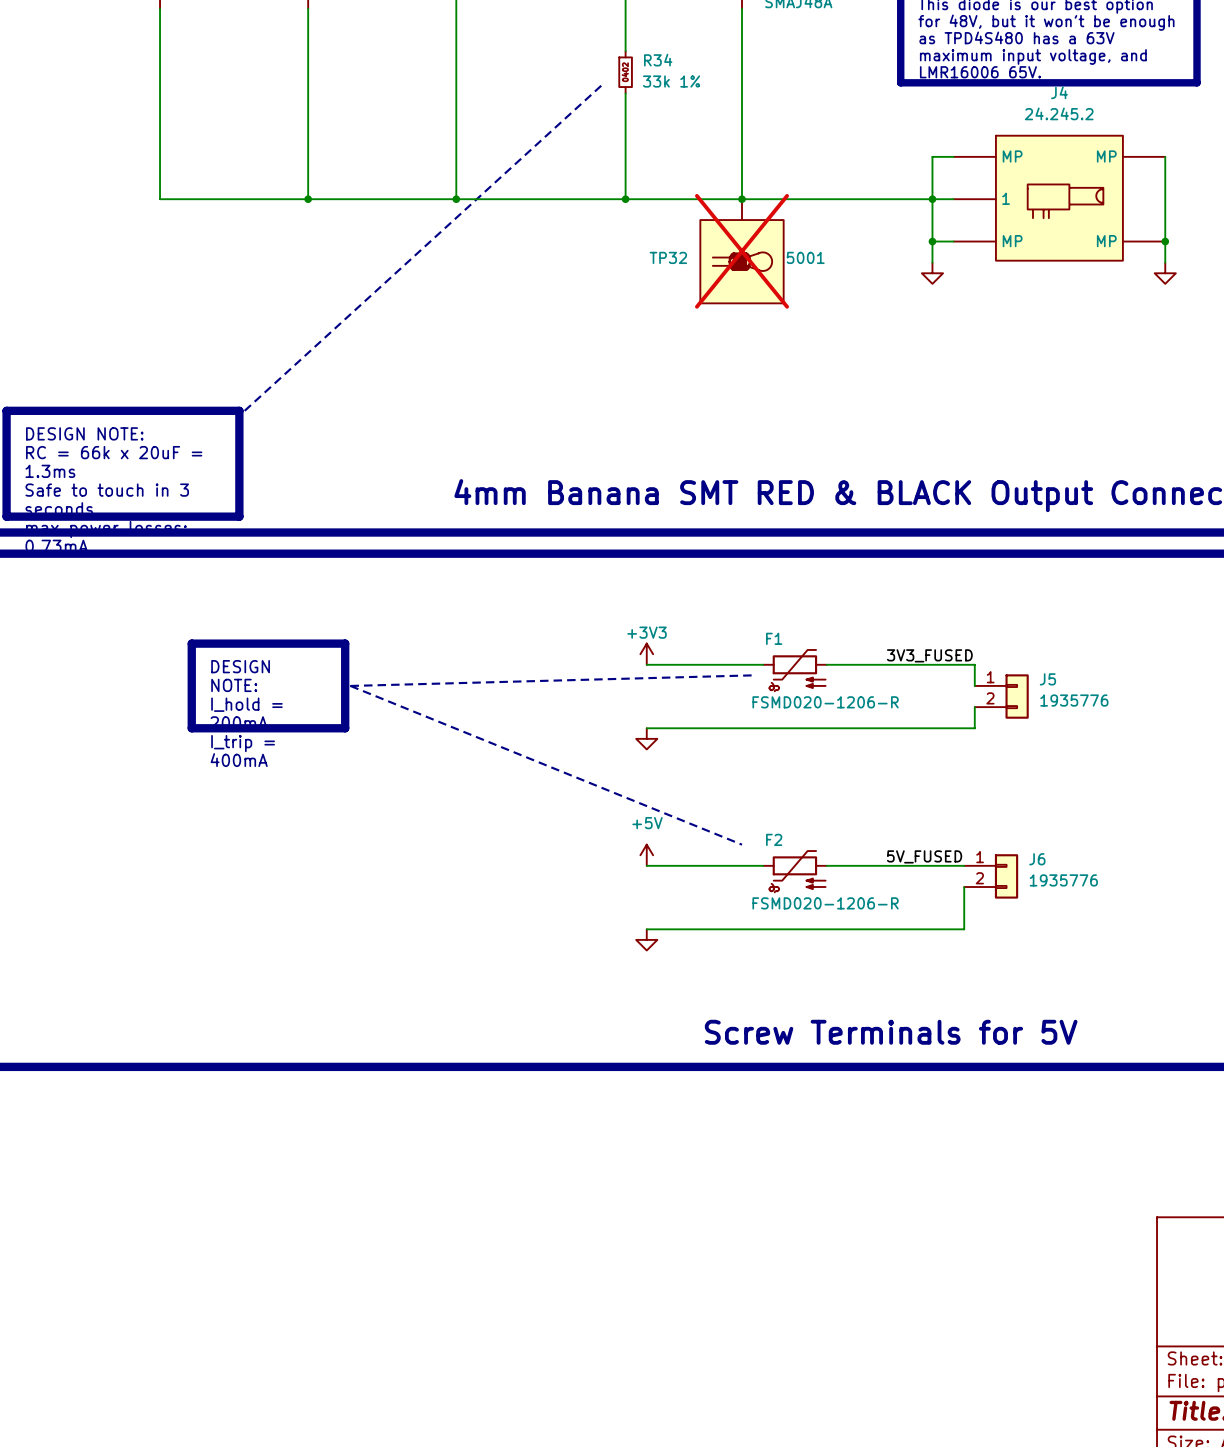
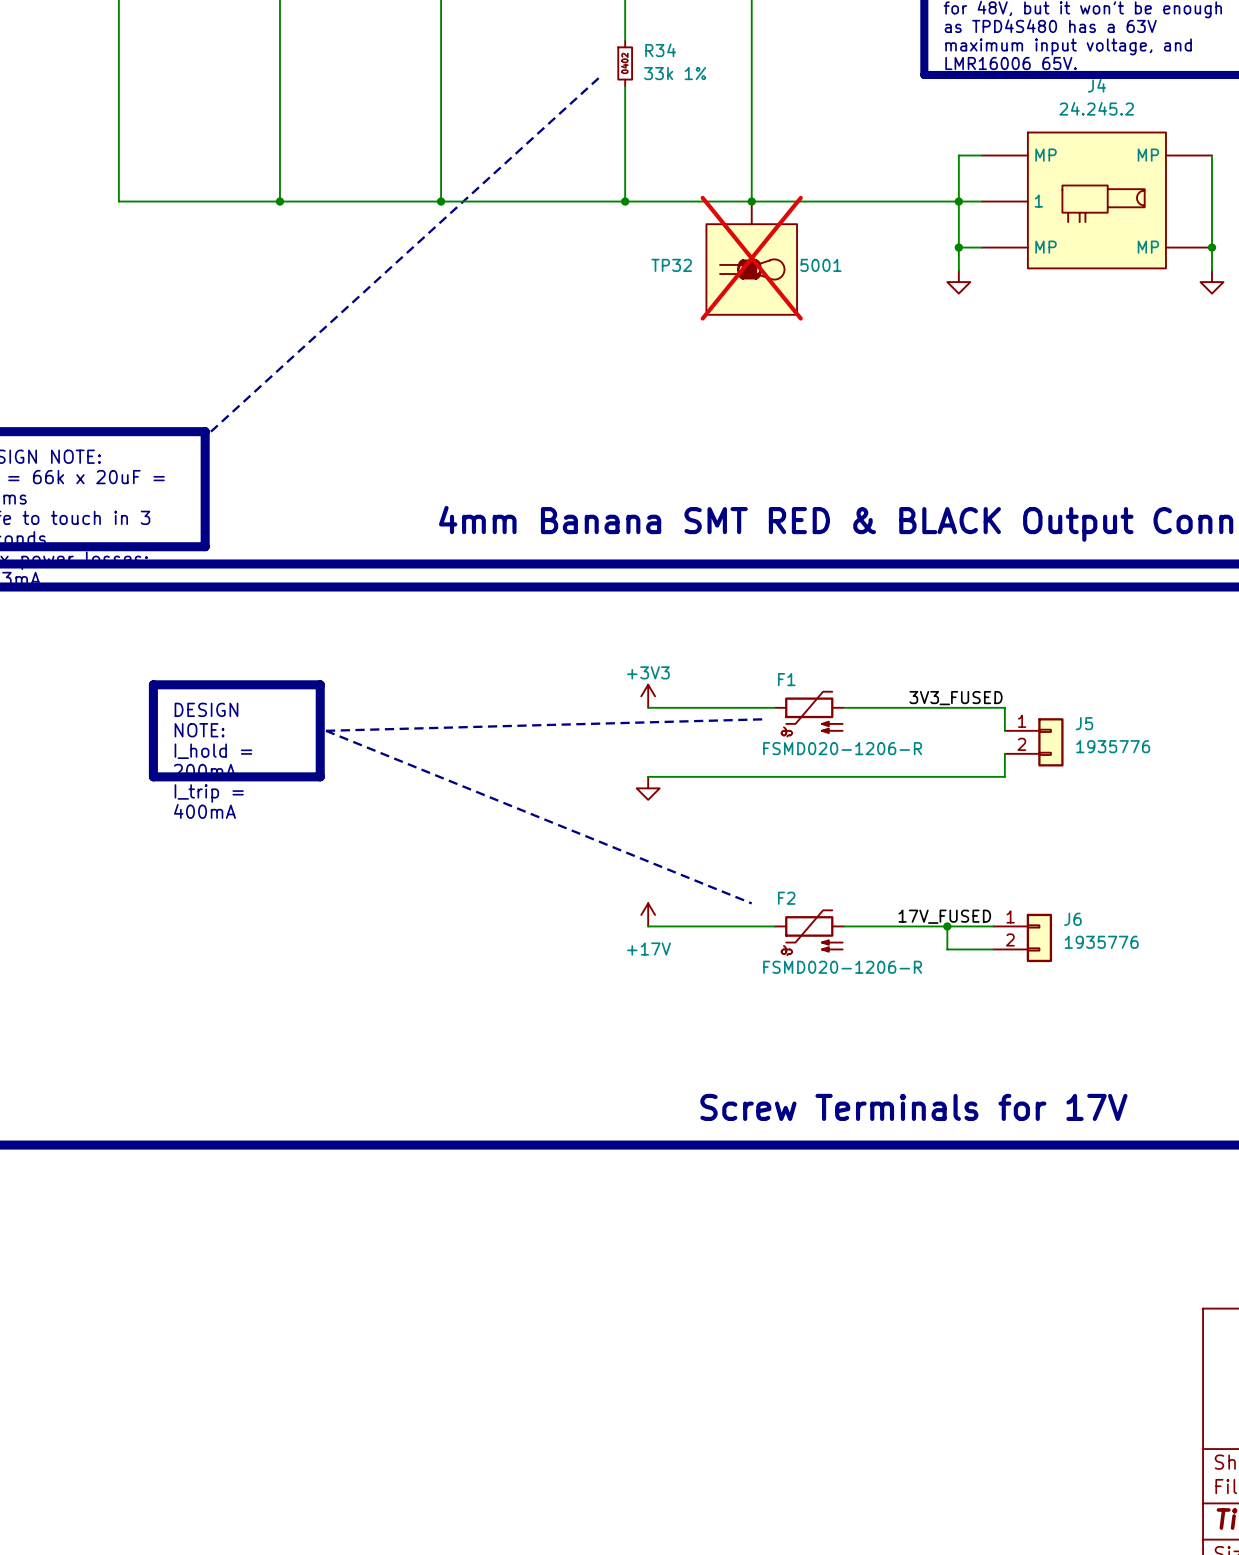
power symbol: +5V (646, 855) -> +17V (648, 914)
label: 5V_FUSED (924, 856) -> 17V_FUSED (944, 916)
junction: none -> (947, 926)
wire: (964, 887) (964, 929) (646, 929) -> (993, 949) (947, 949) (947, 926)
power symbol: (646, 939) -> none
text: Screw Terminals for 5V (891, 1032) -> Screw Terminals for 17V (913, 1107)

